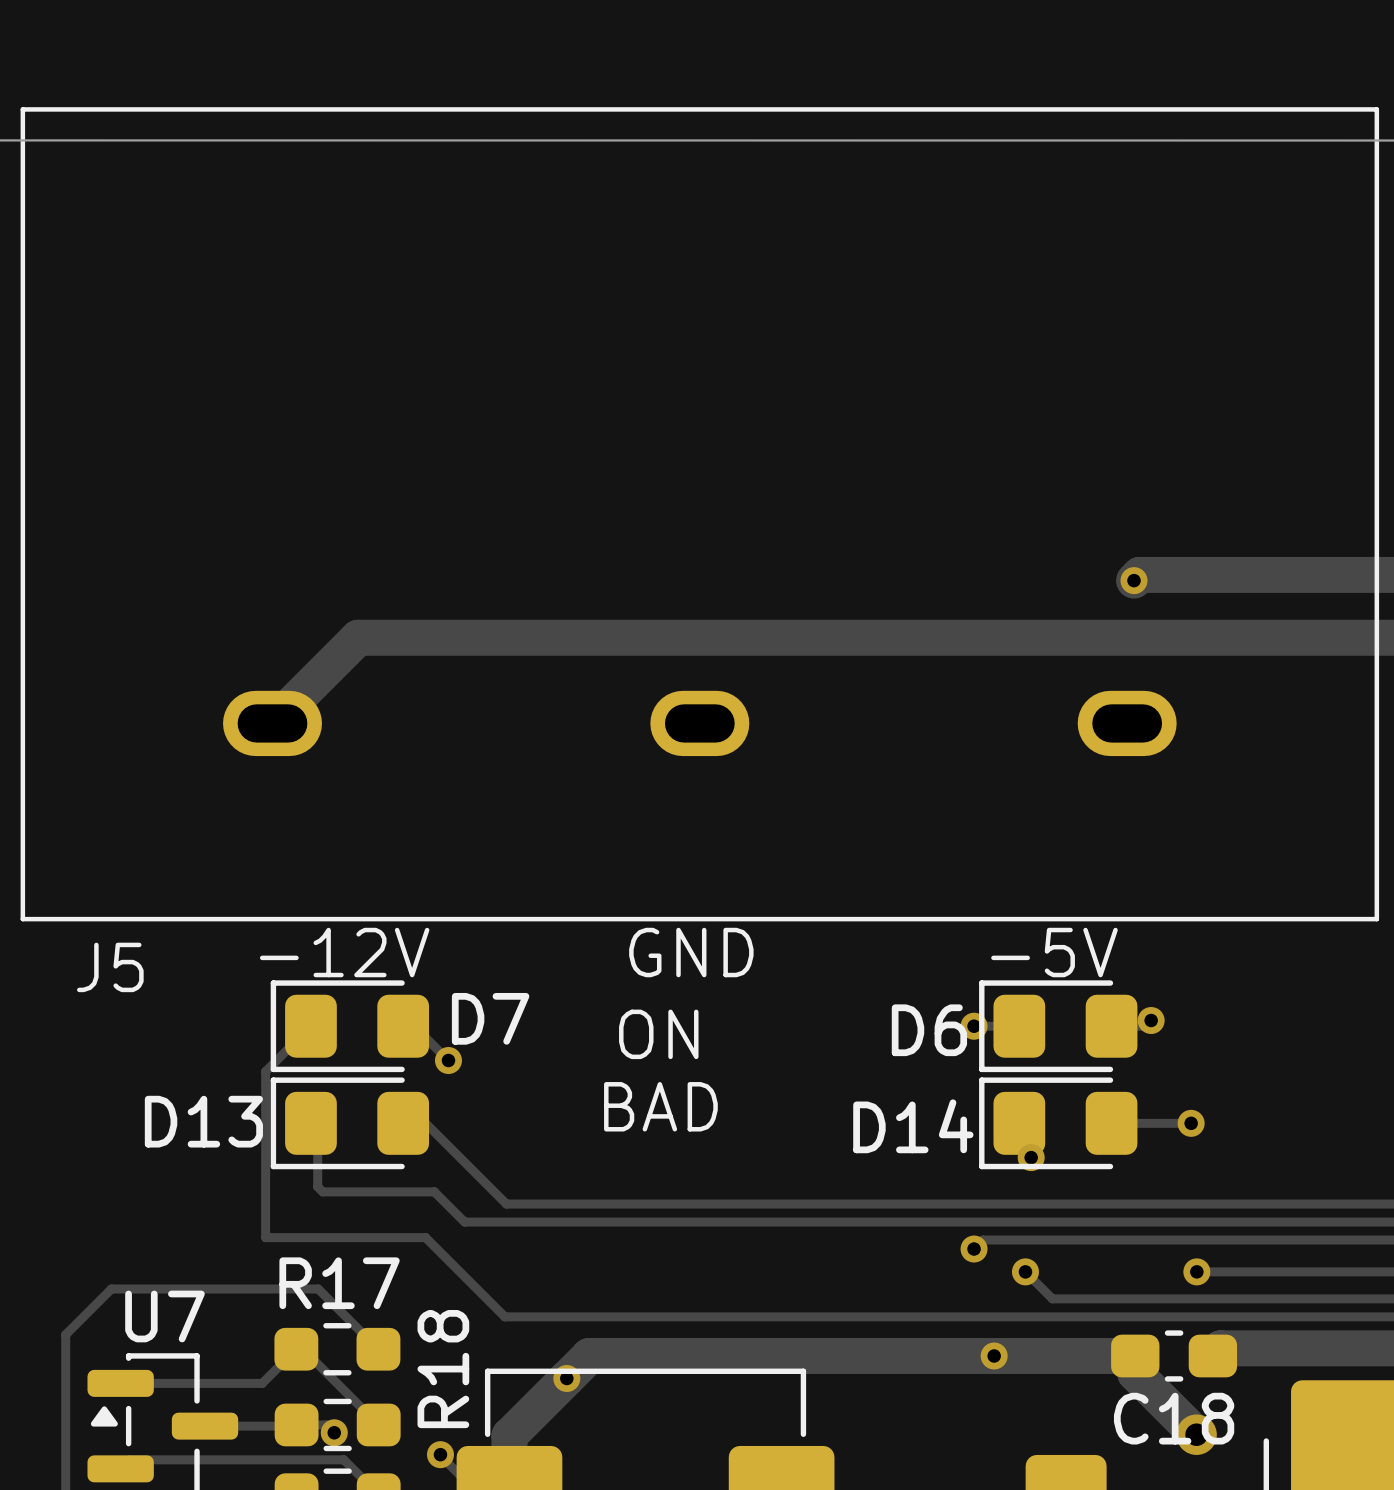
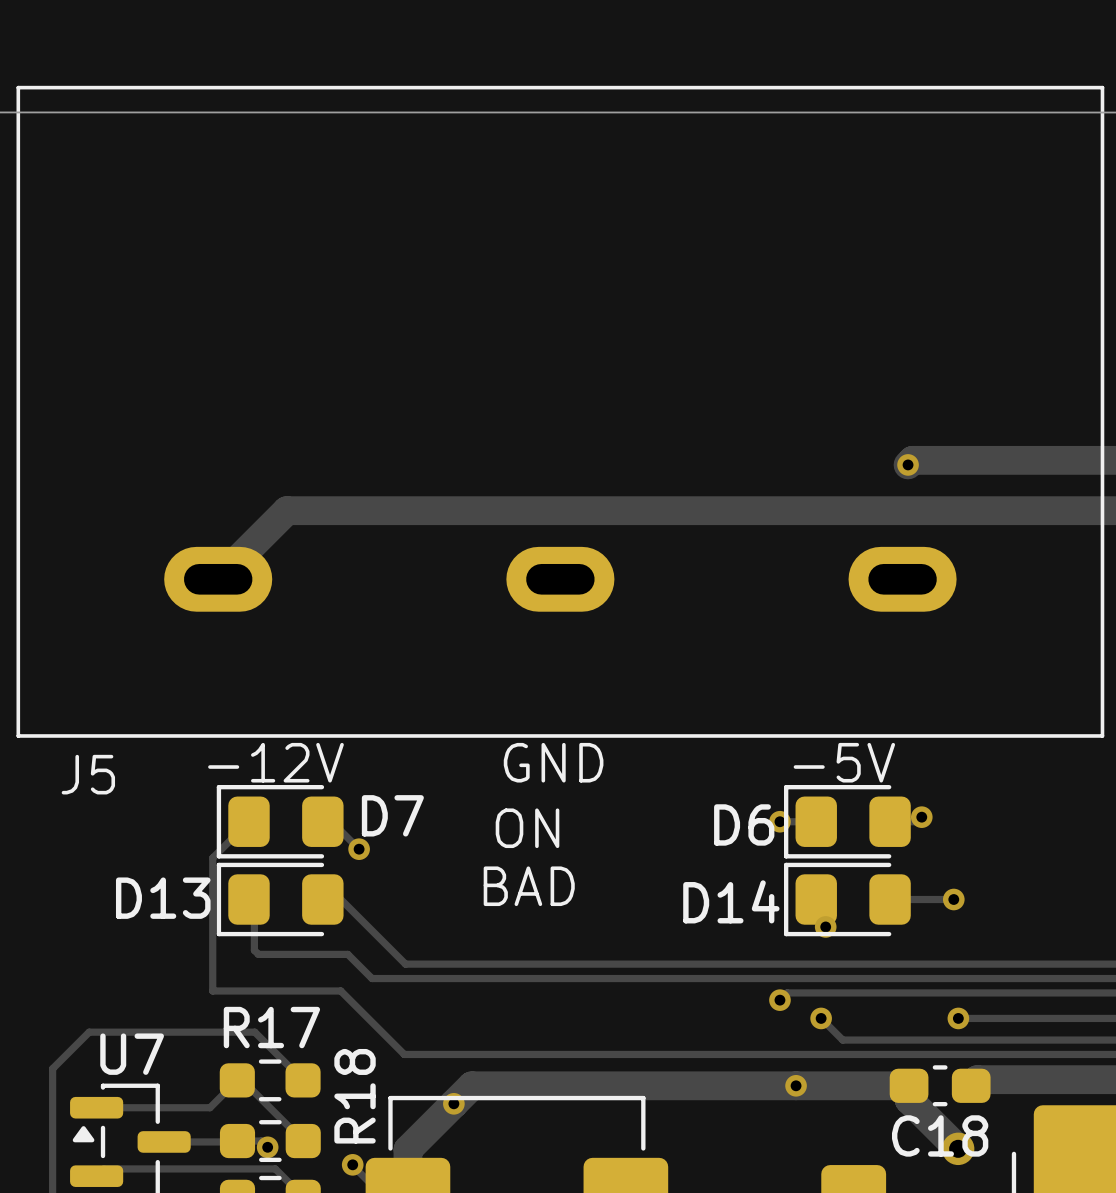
J5 footprint: [20, 107, 1380, 922] -> [16, 85, 1105, 738]

